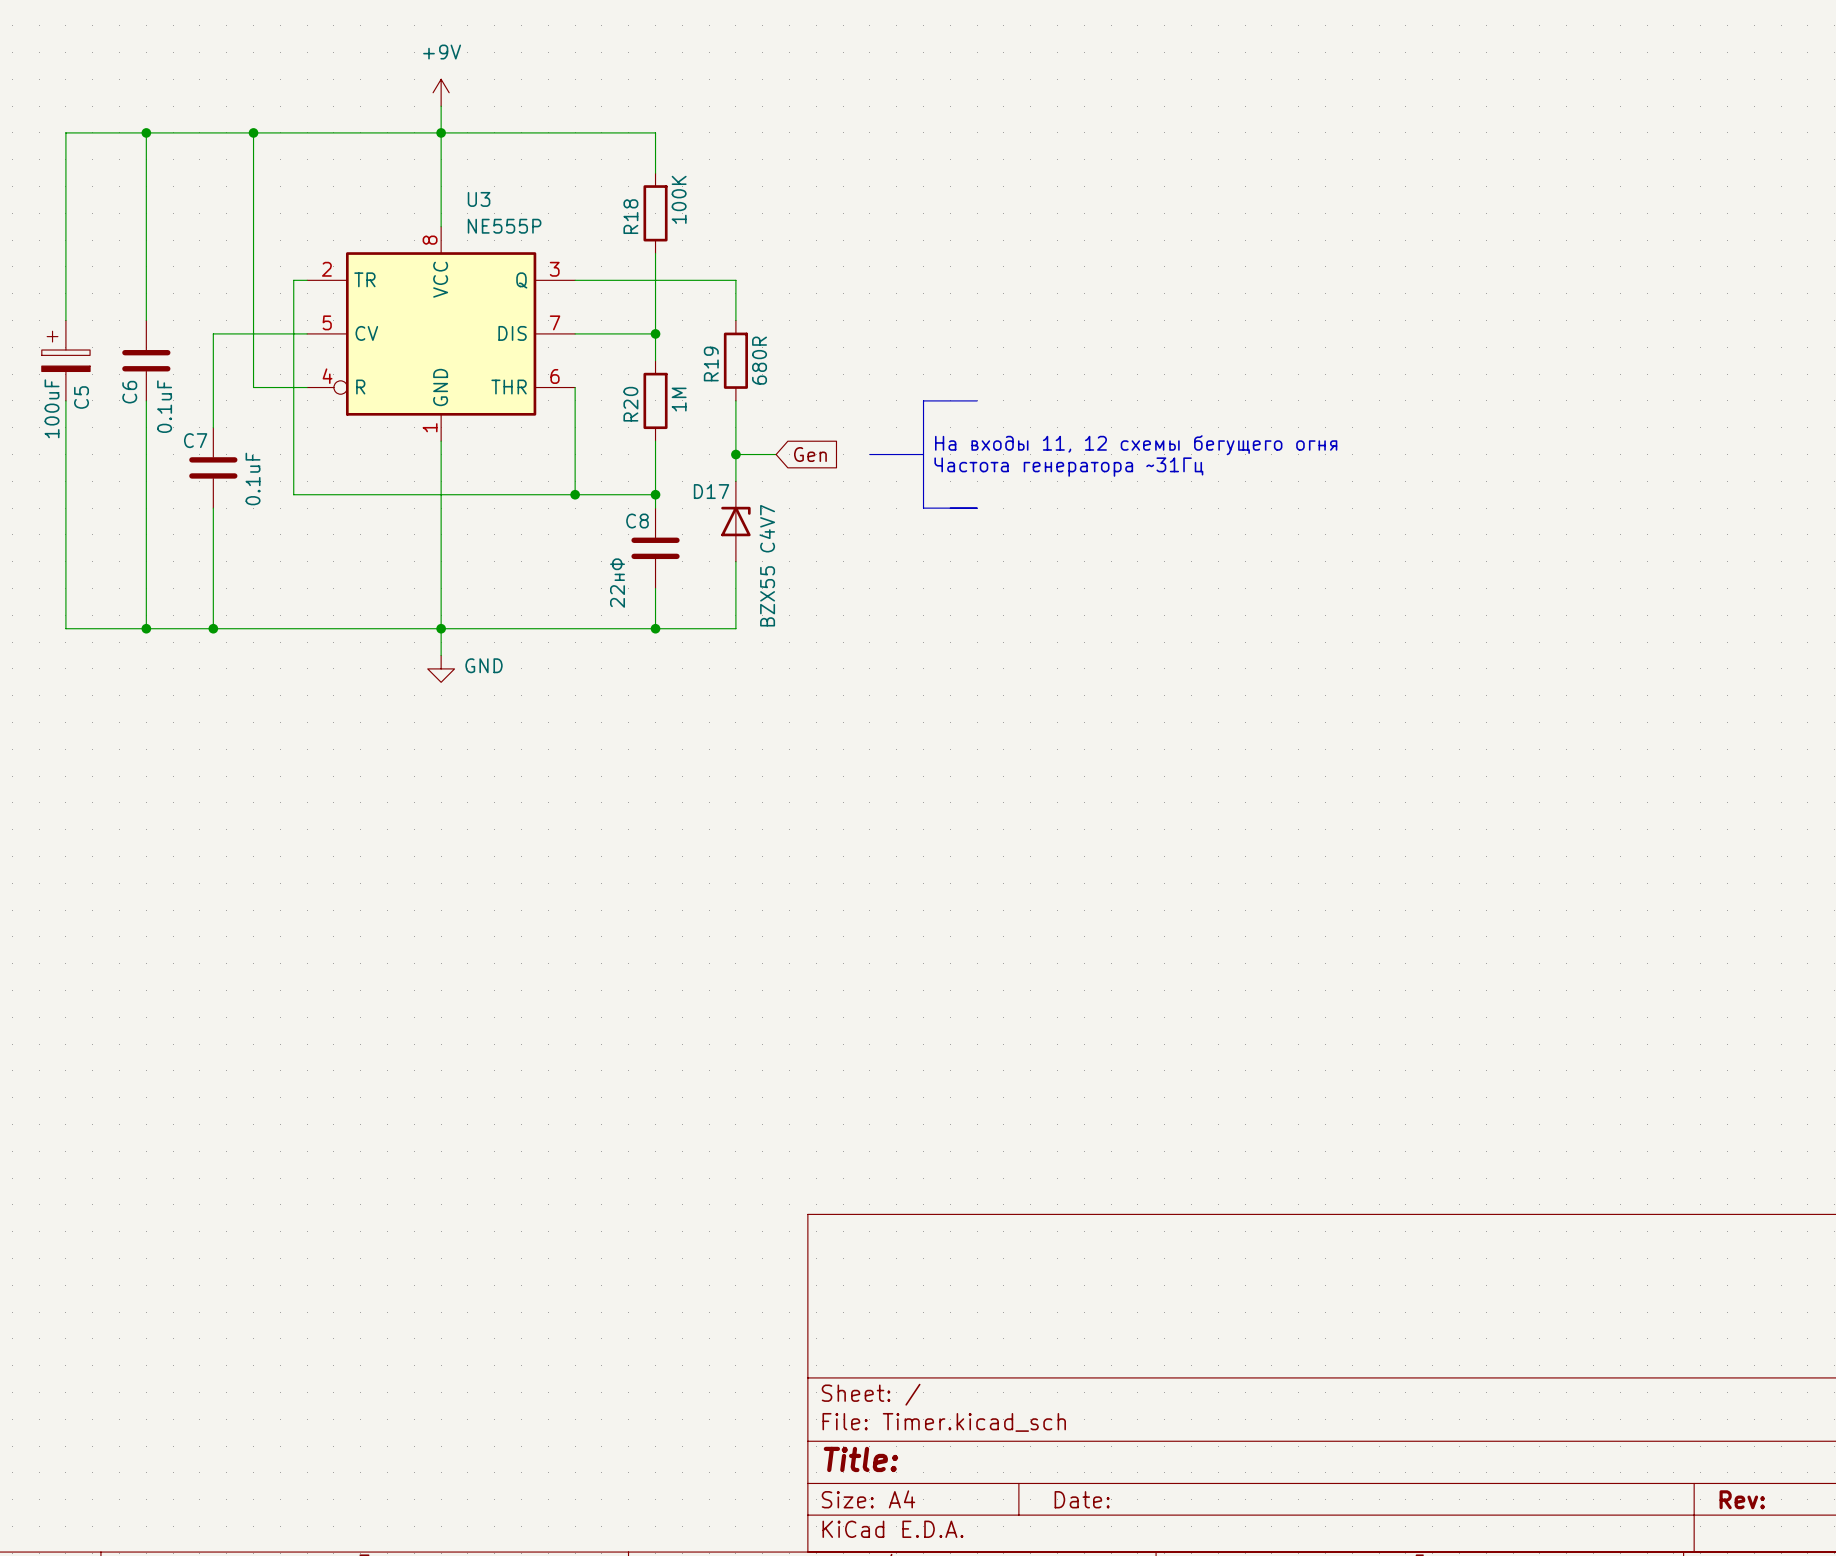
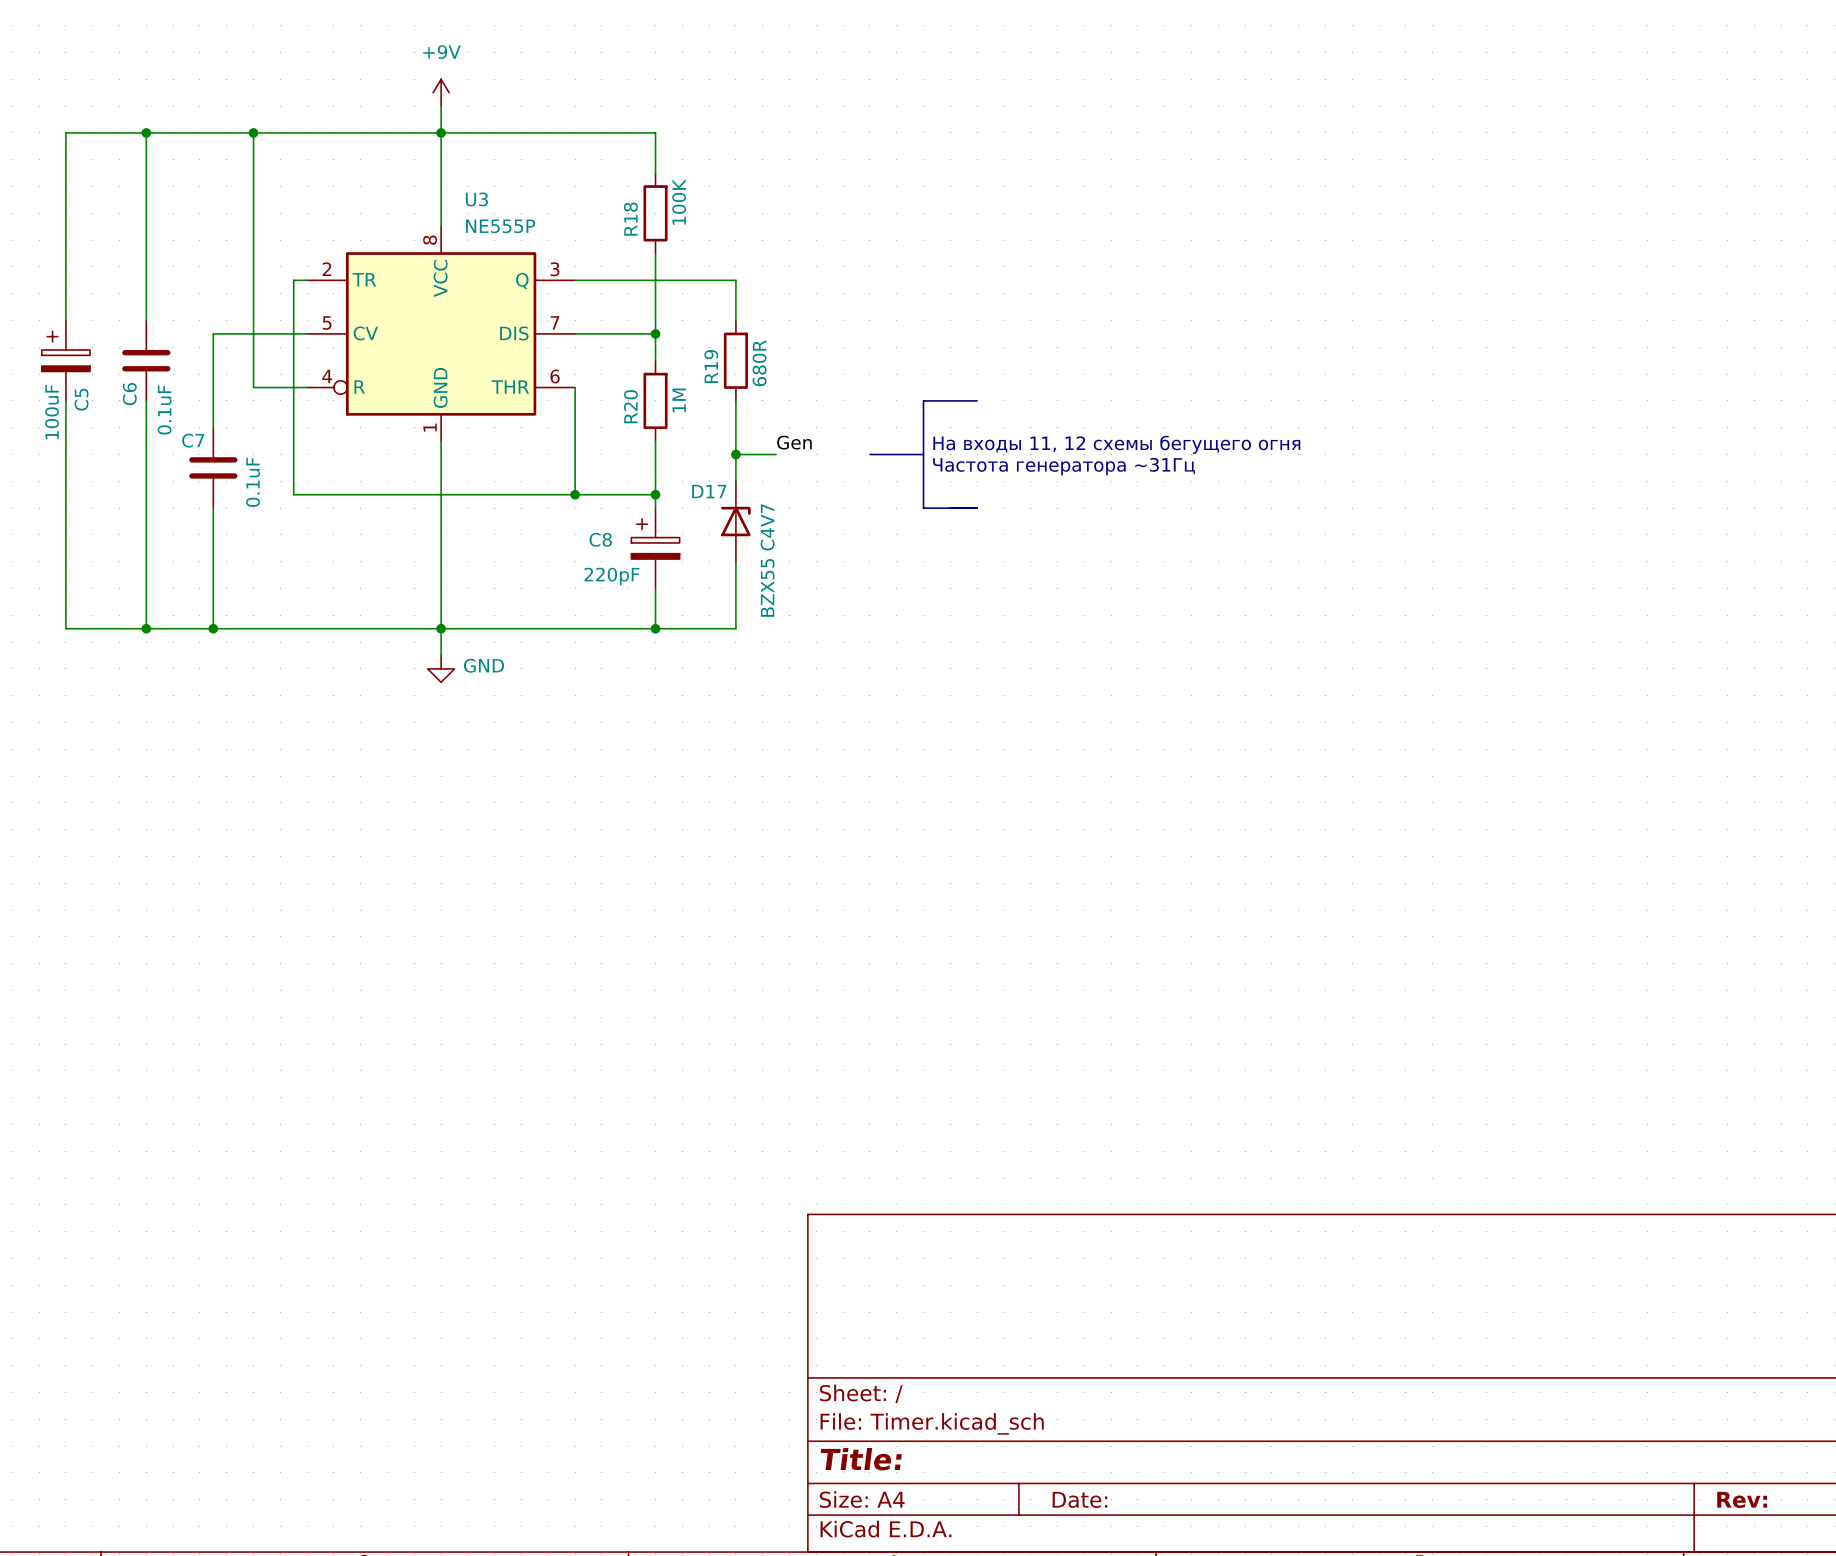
label: none -> Gen (794, 442)
global label: Gen (810, 454) -> none
C8 symbol: [631, 508, 680, 589] -> [631, 508, 680, 589]
C8 name position: C8 (637, 521) -> C8 (600, 539)
C8 value: 22нФ (617, 583) -> 220pF (611, 576)

